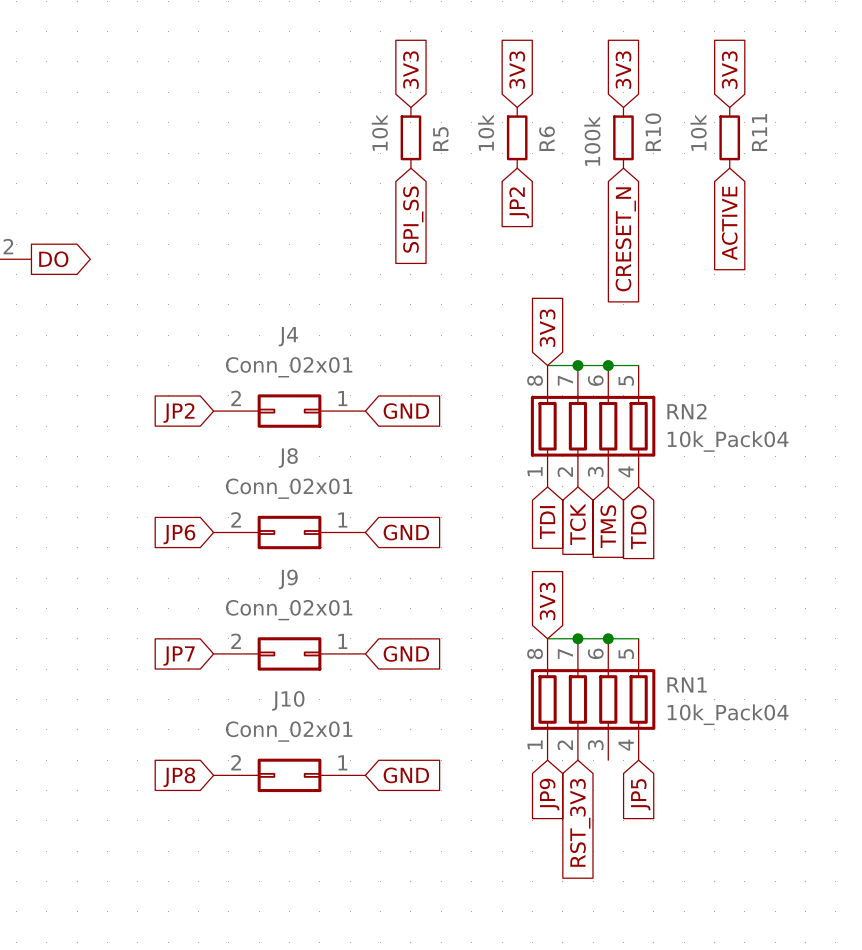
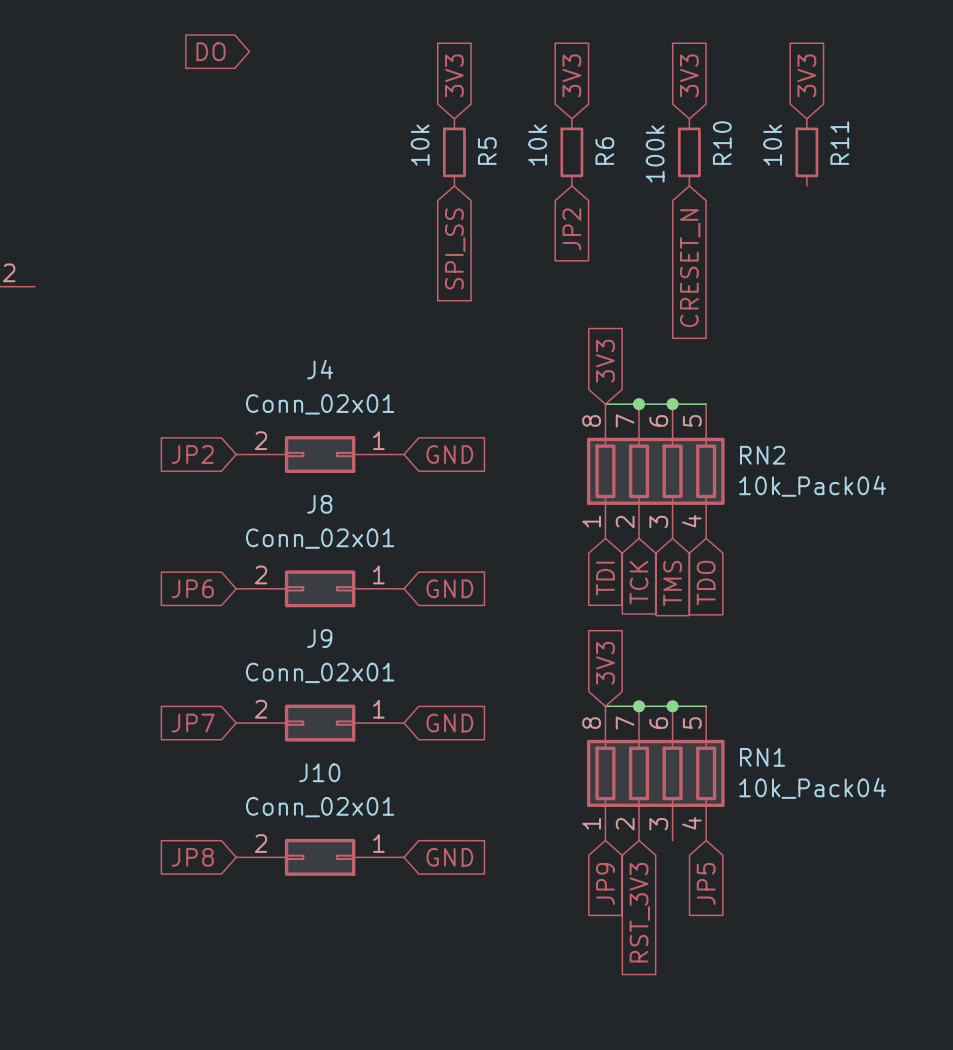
global label: ACTIVE (729, 223) -> none
global label position: DO (53, 259) -> DO (211, 51)

